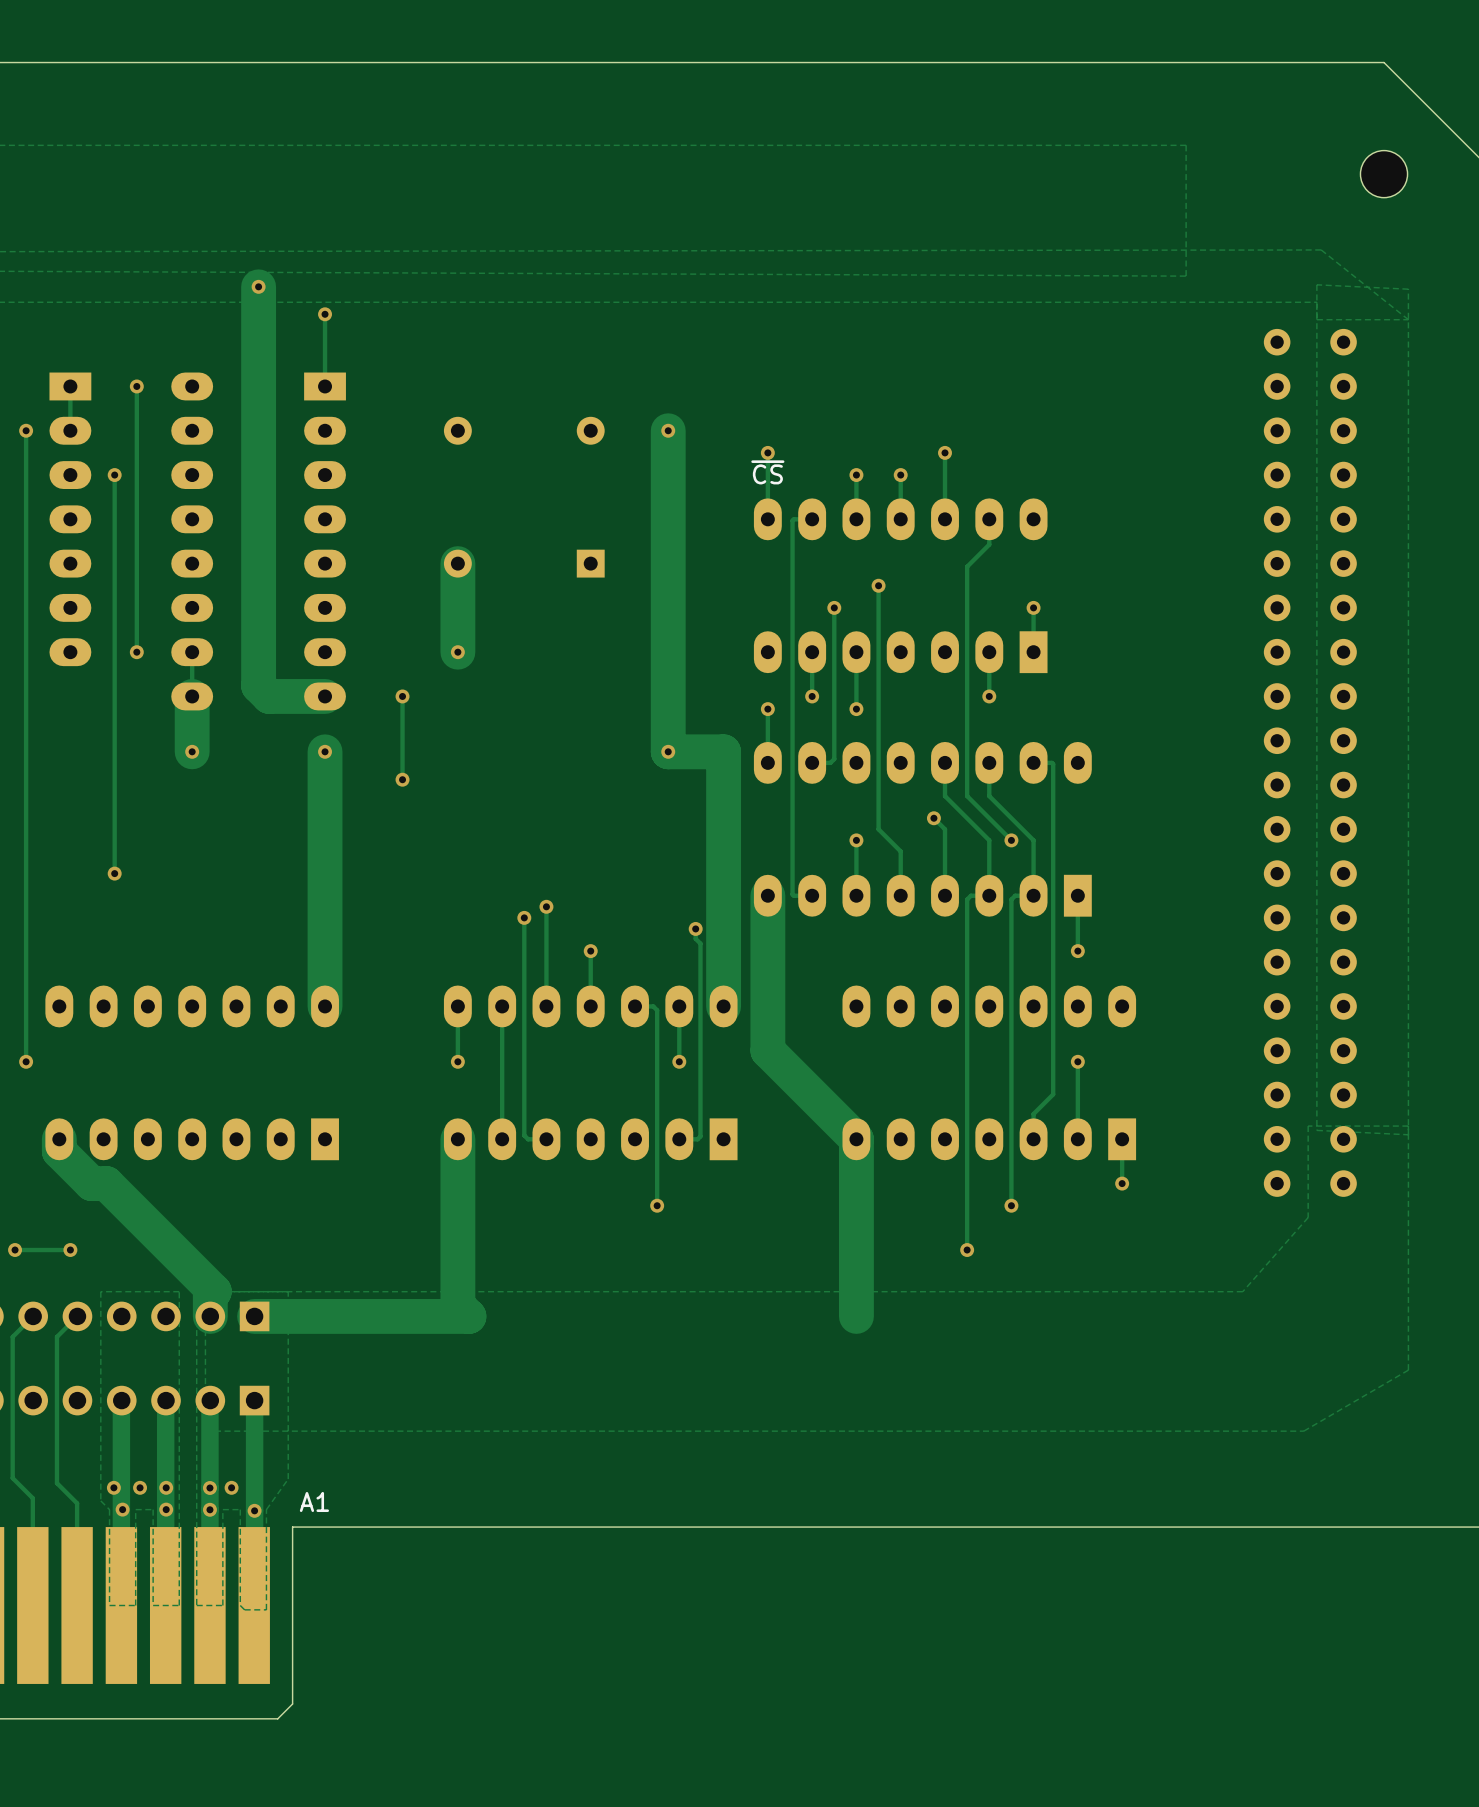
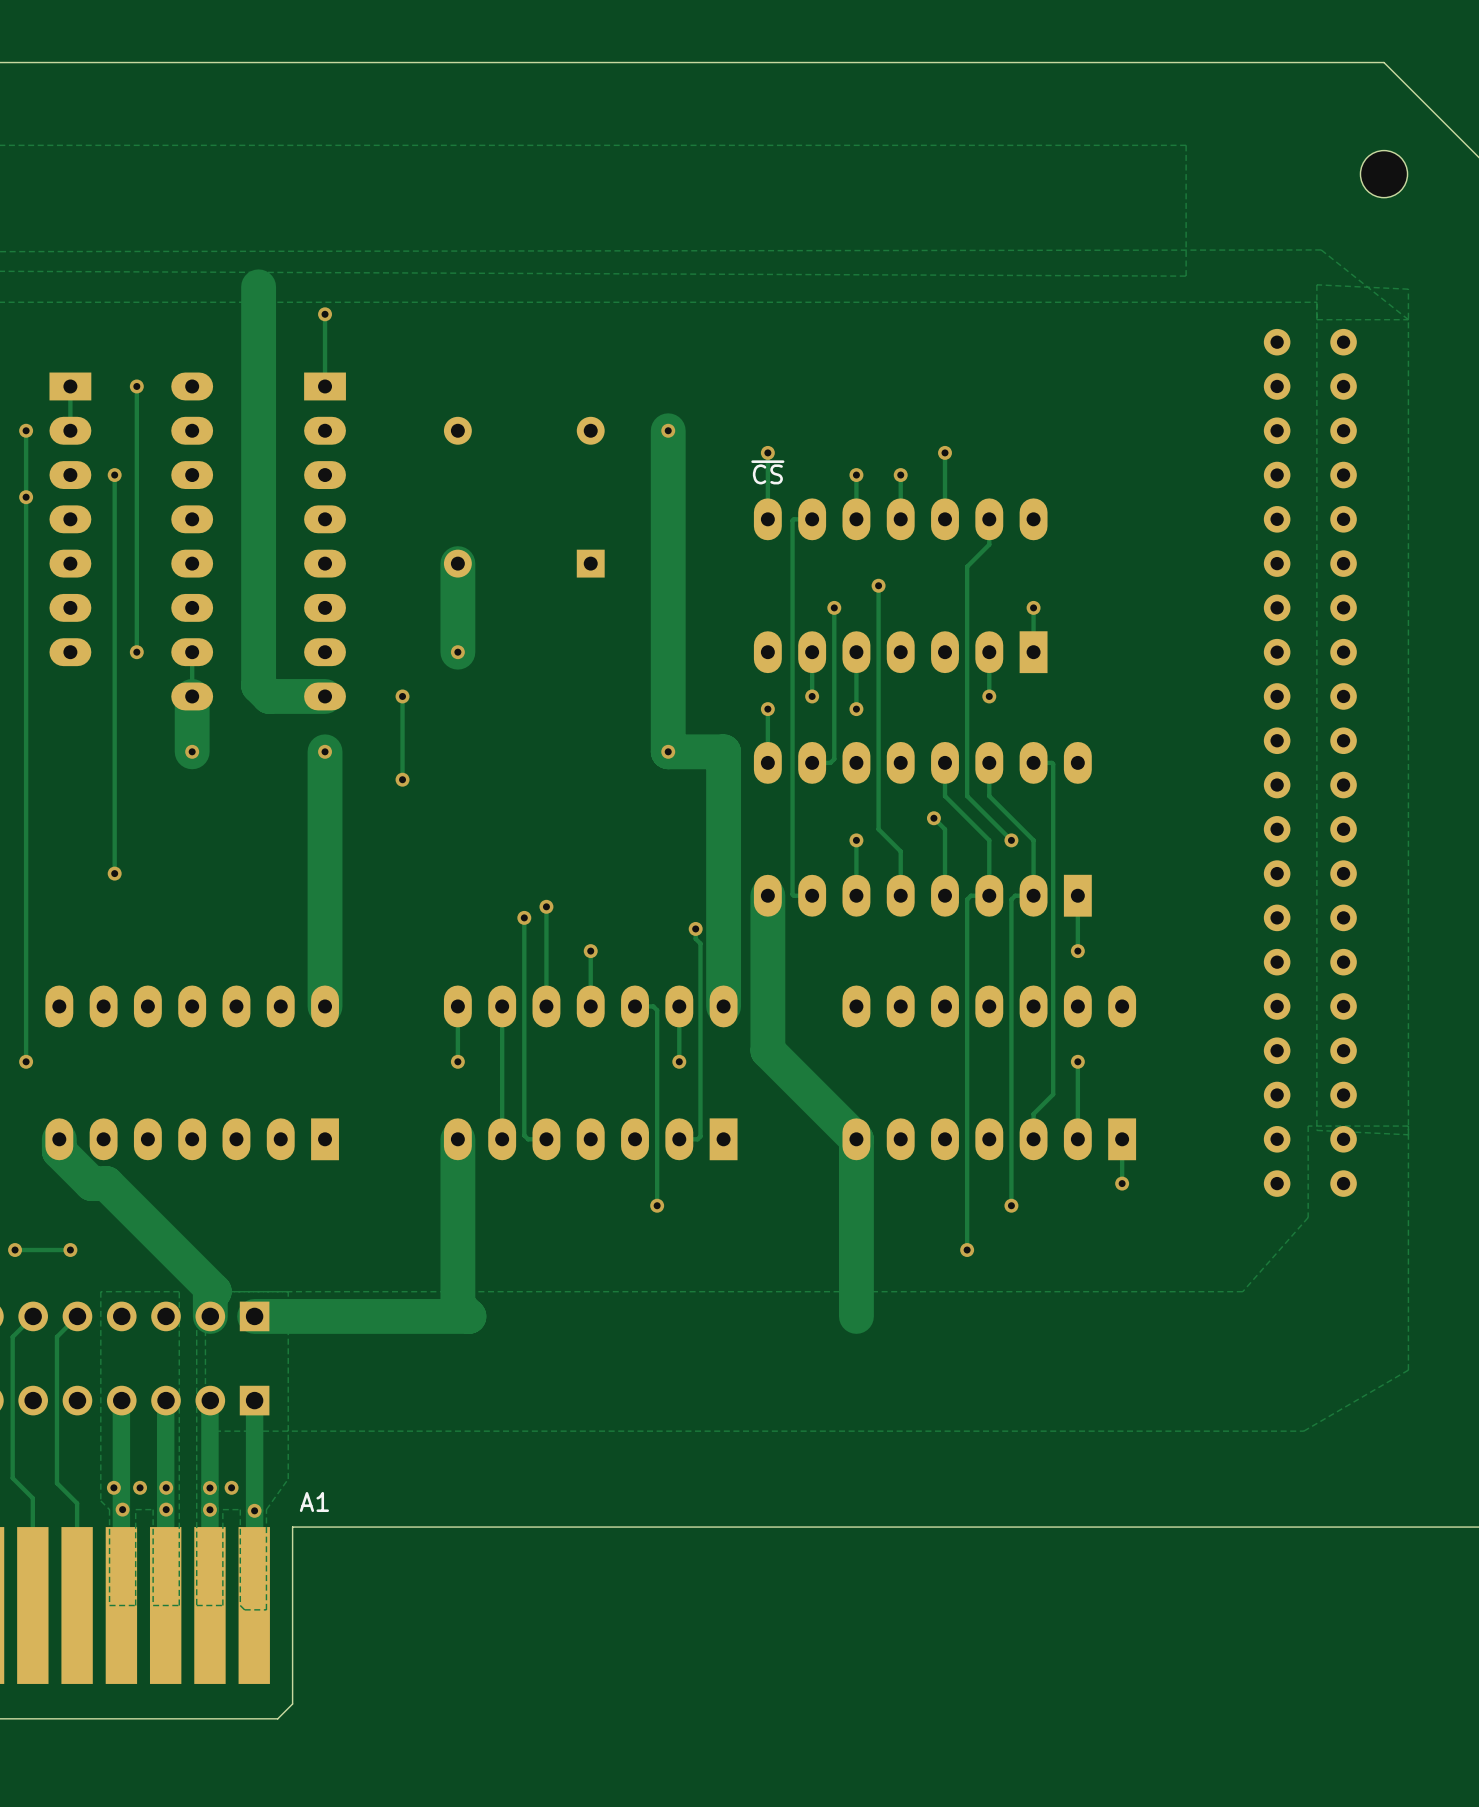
via: (258, 286) -> none
via: none -> (26, 497)

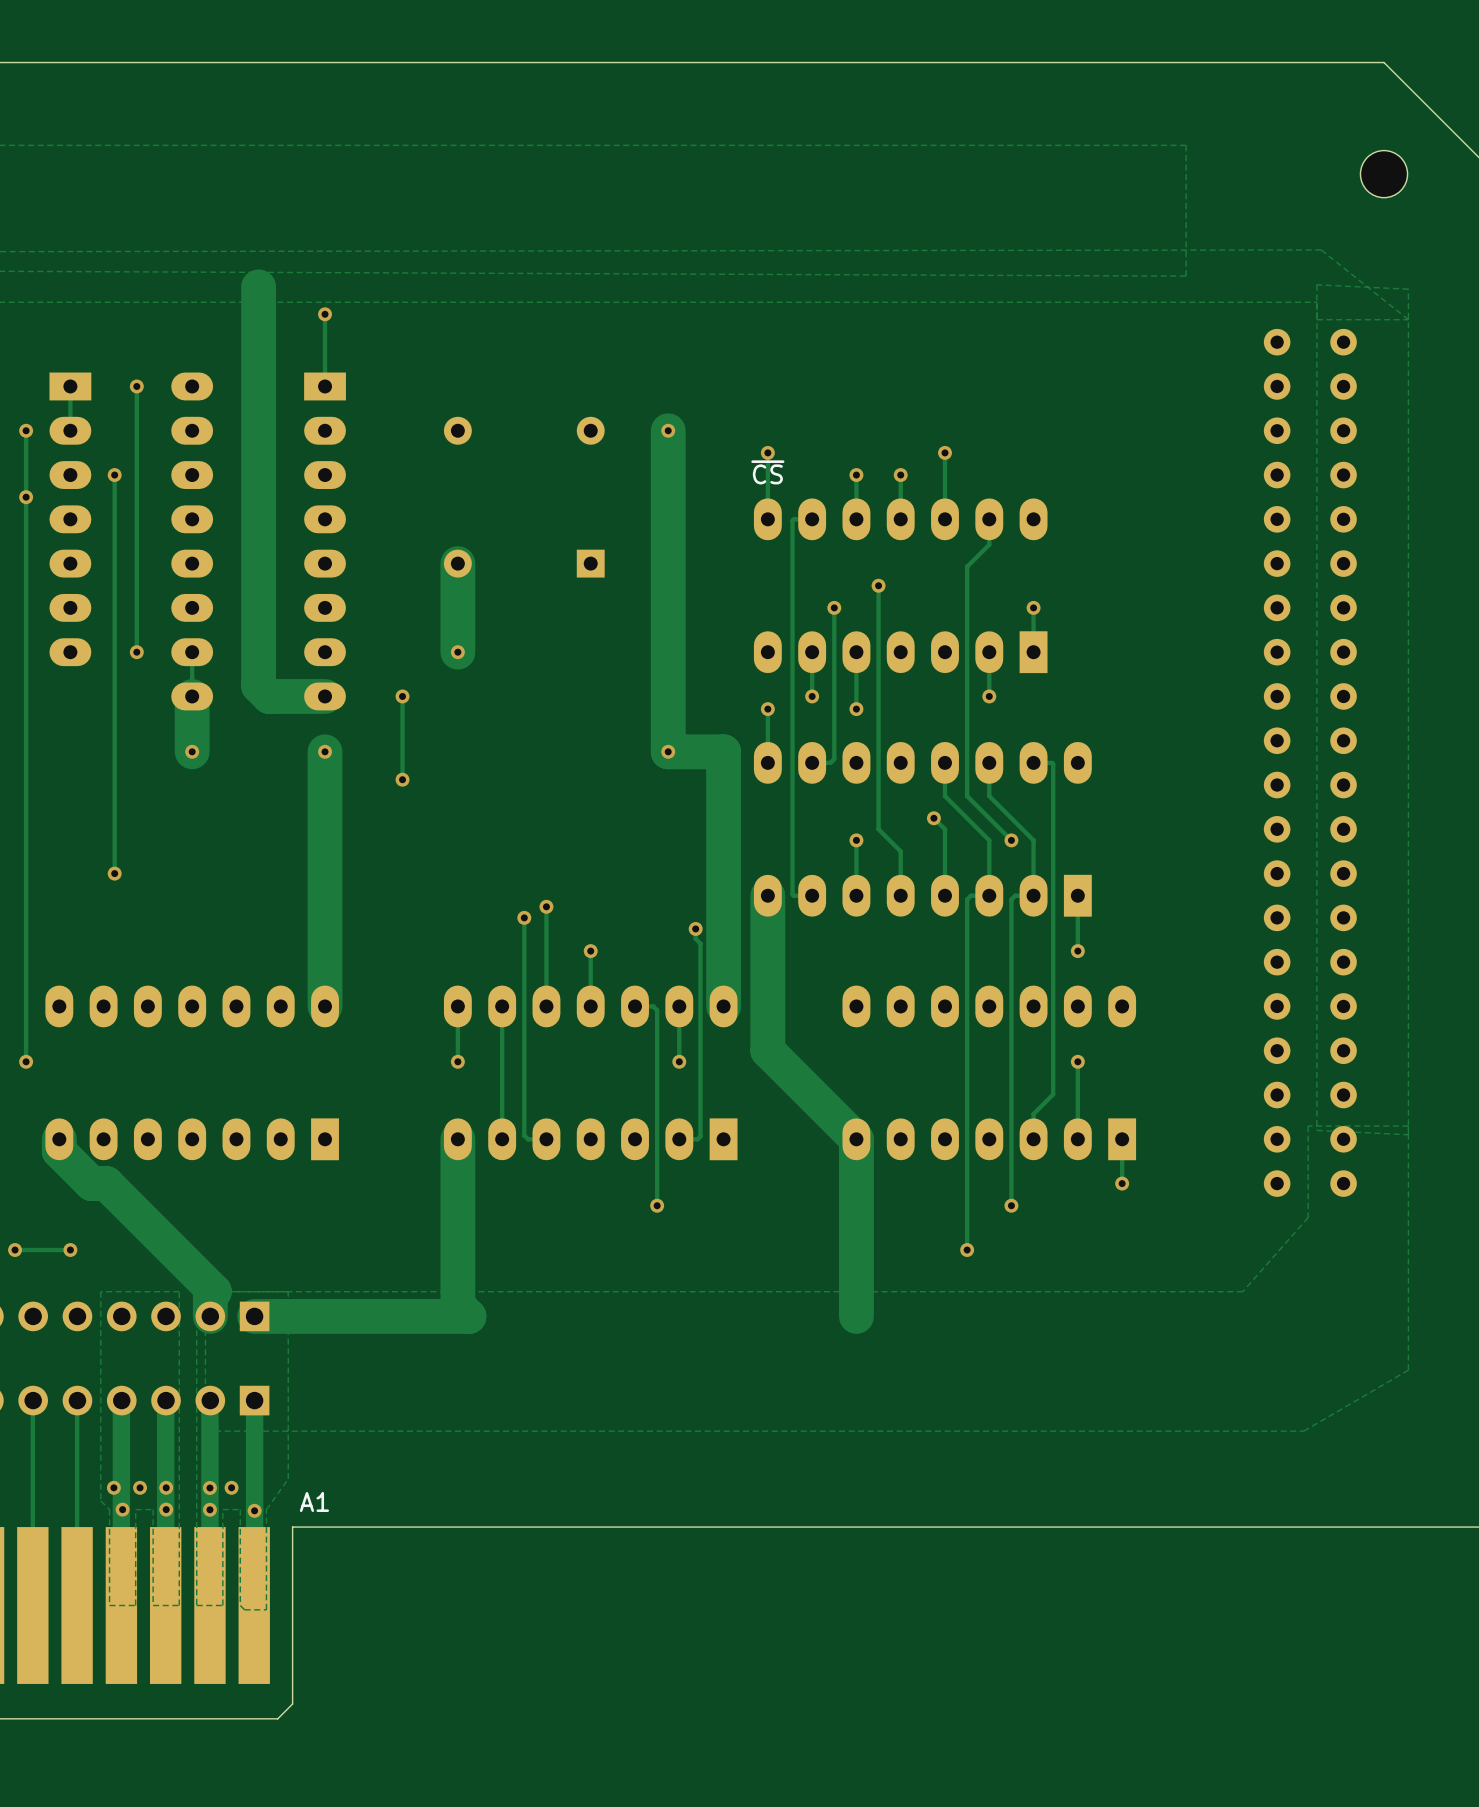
track: (33, 1316) (12, 1336) (12, 1478) (32, 1498) -> (33, 1400) (32, 1498)
track: (77, 1316) (56, 1336) (56, 1483) (77, 1503) -> (77, 1400) (77, 1503)

